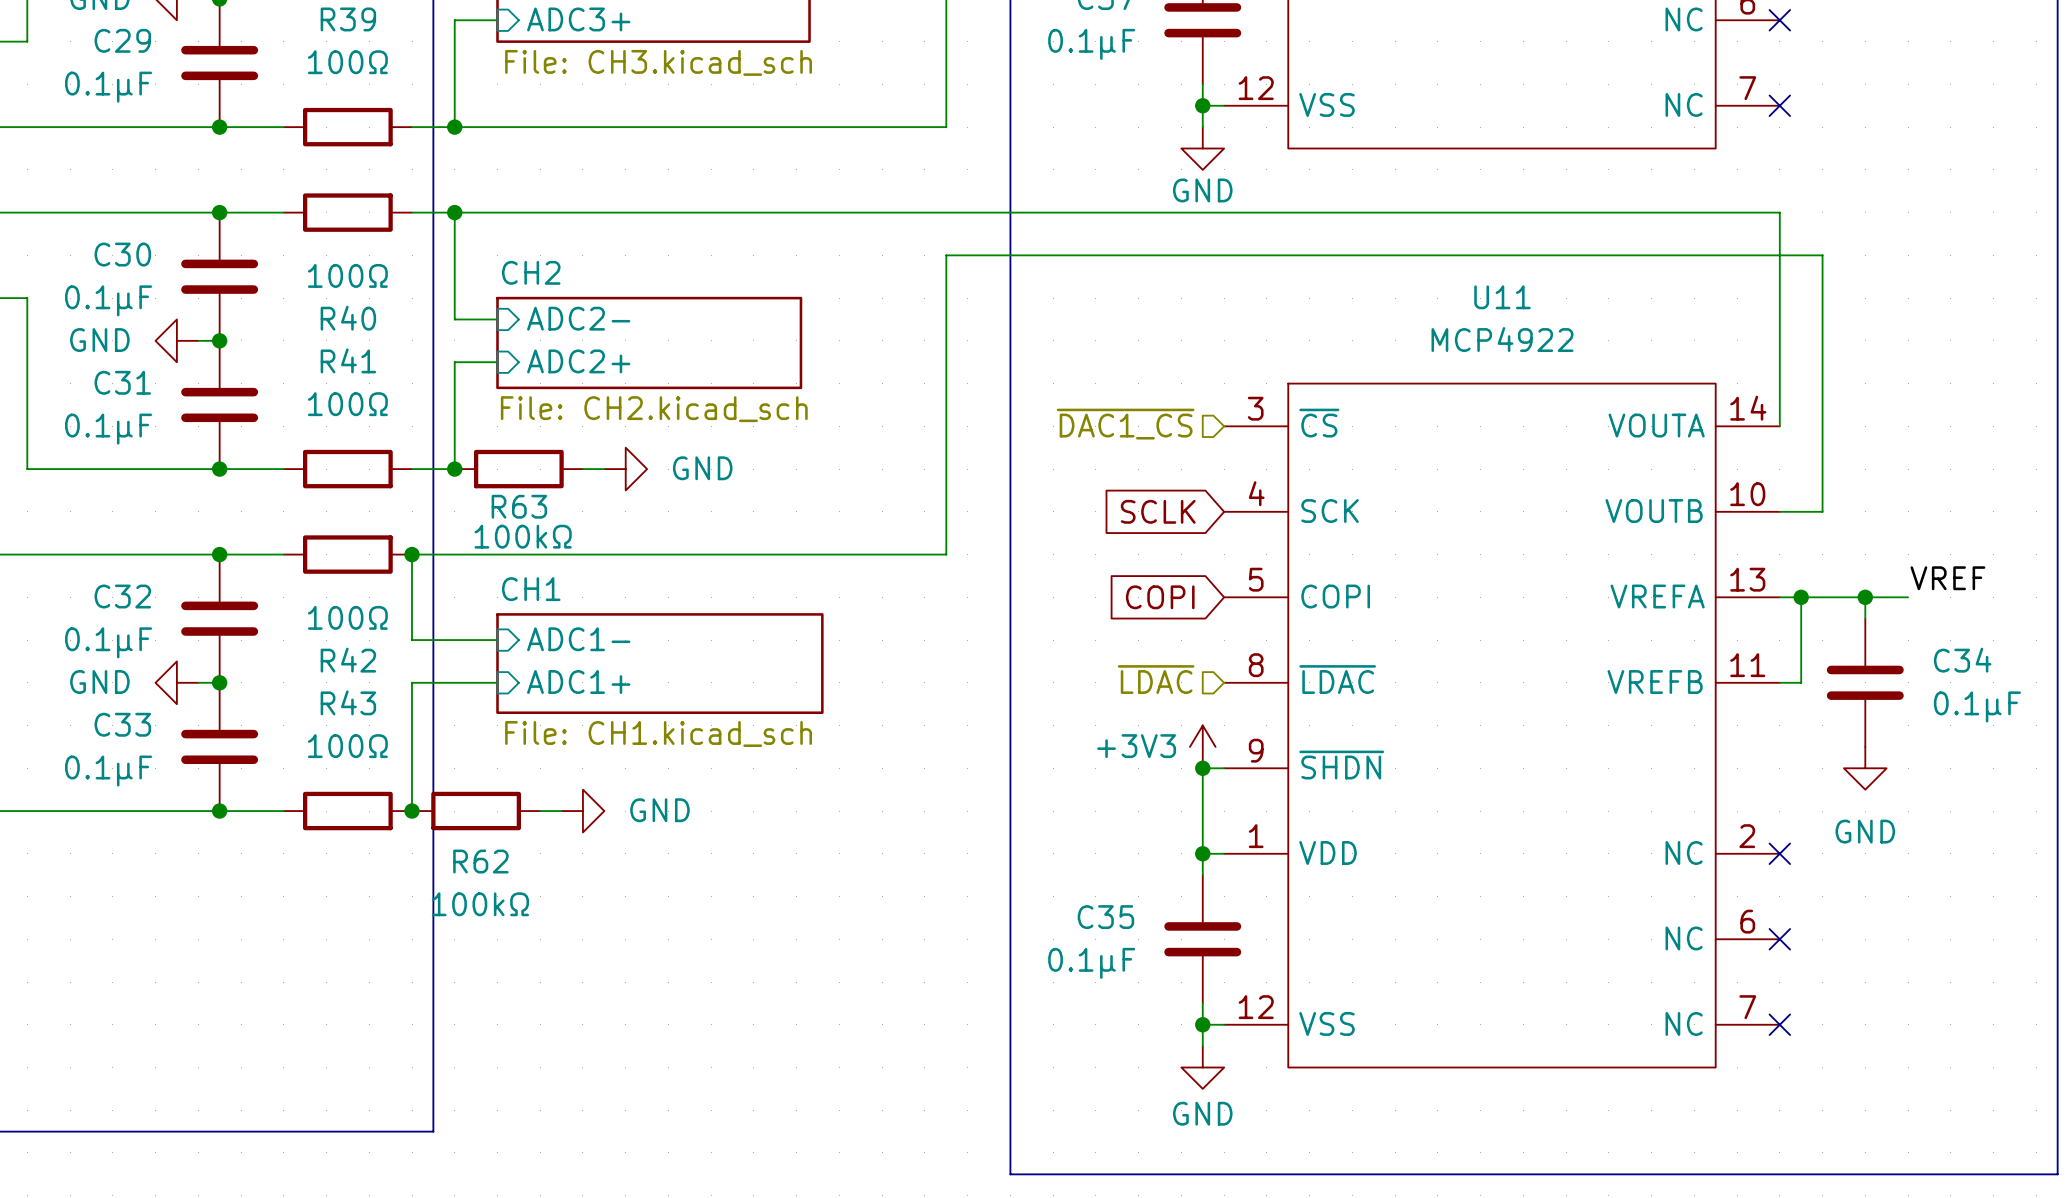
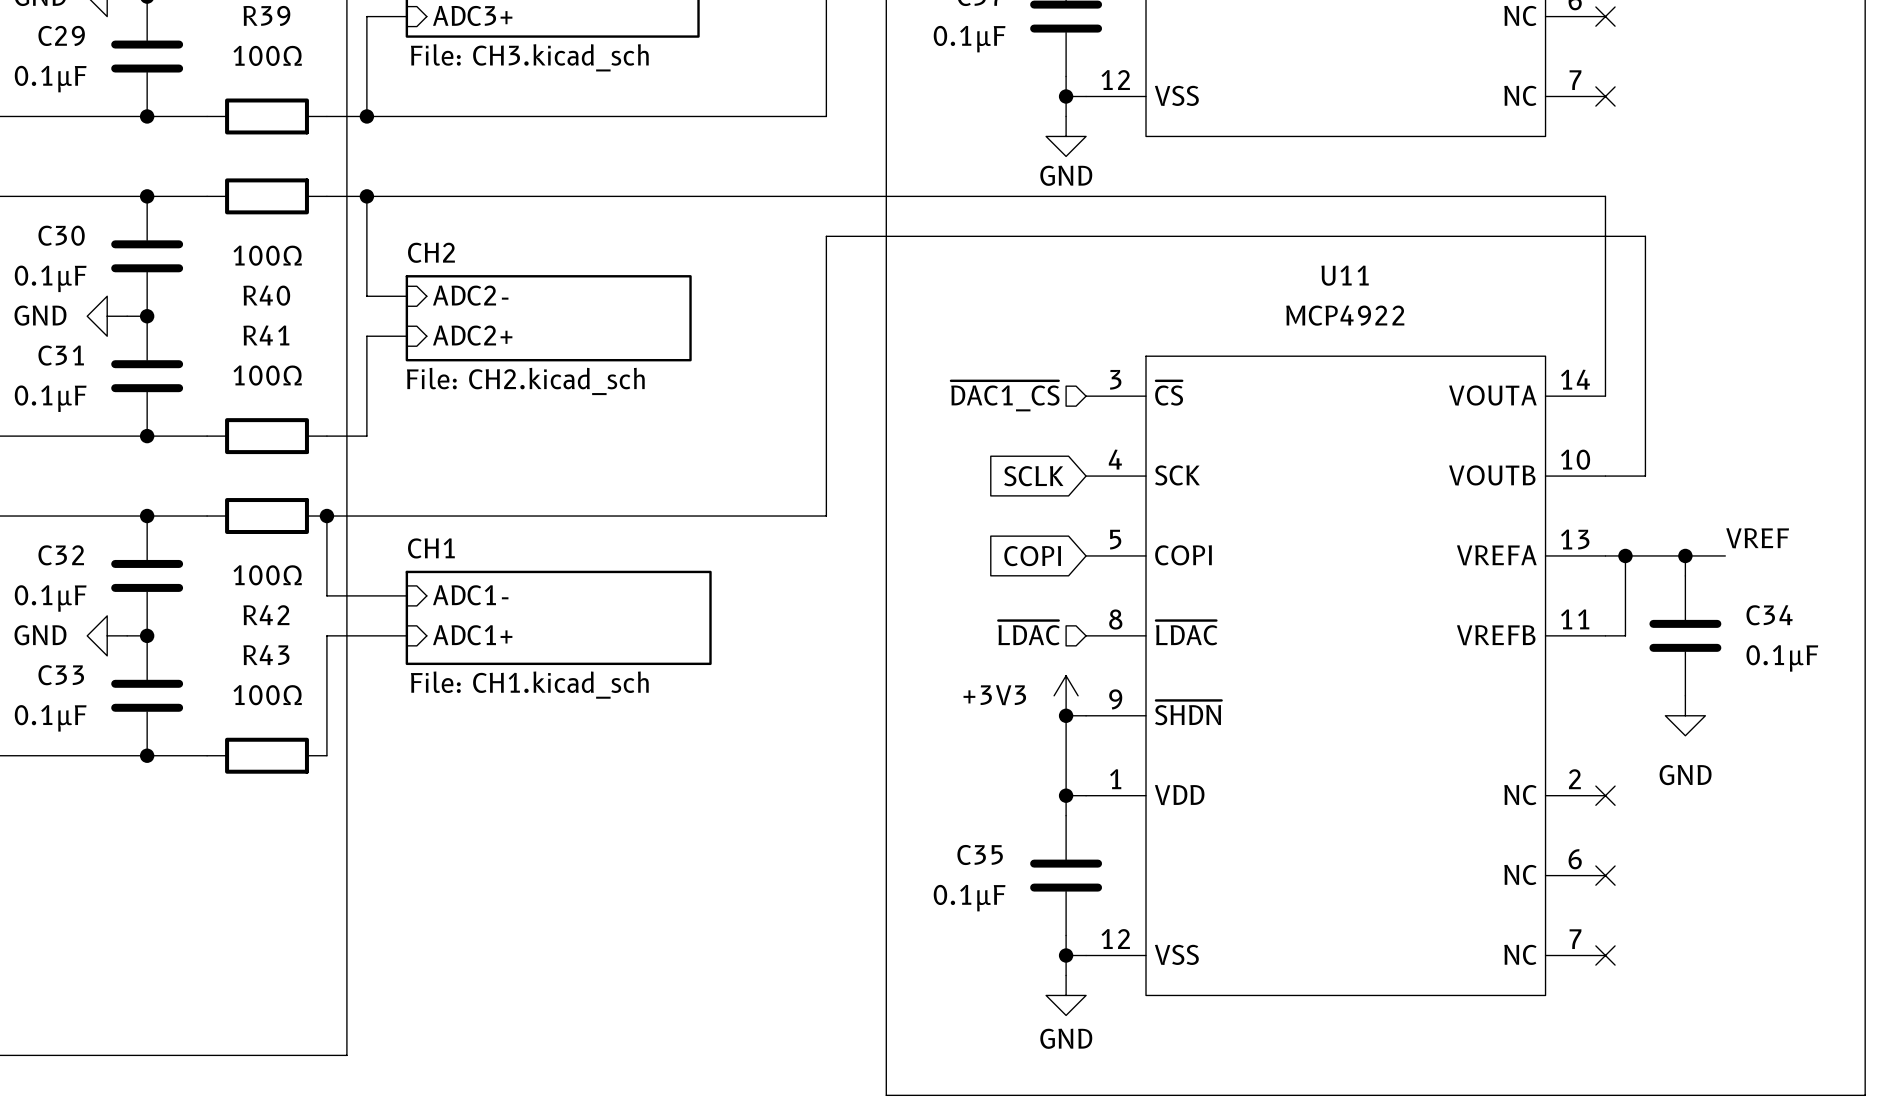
junction: (454, 469) -> none
R63: 100kΩ (518, 469) -> none
wire: (582, 469) (604, 469) -> none
power symbol: GND (625, 469) -> none
junction: (412, 811) -> none
R62: 100kΩ (476, 811) -> none
wire: (540, 811) (561, 811) -> none
power symbol: GND (582, 811) -> none

